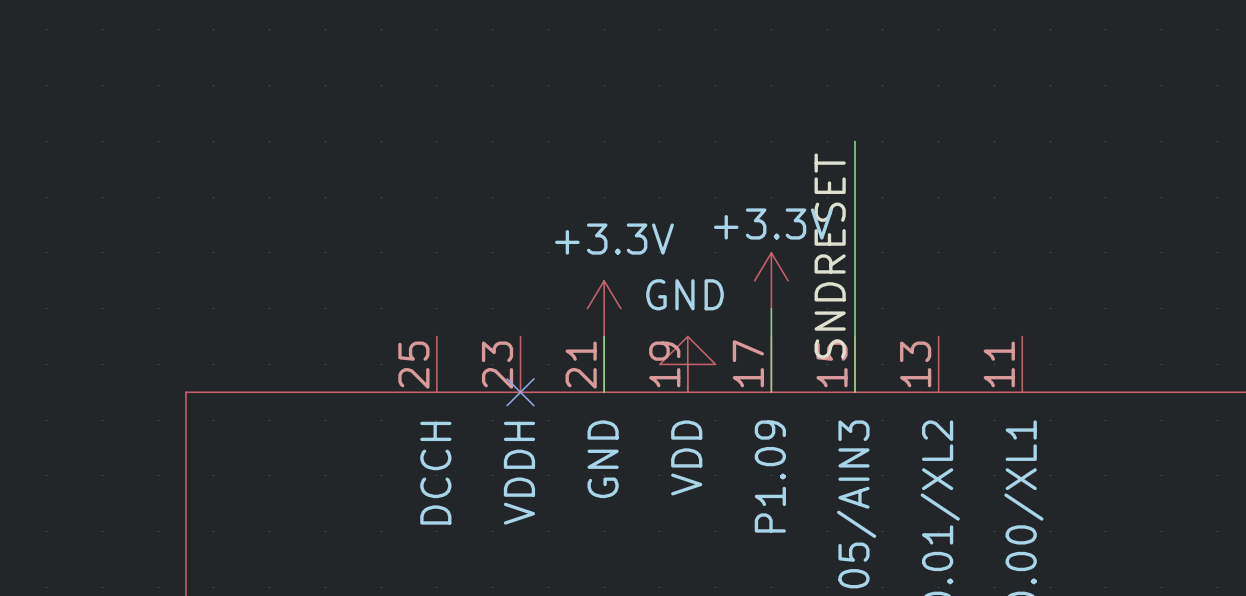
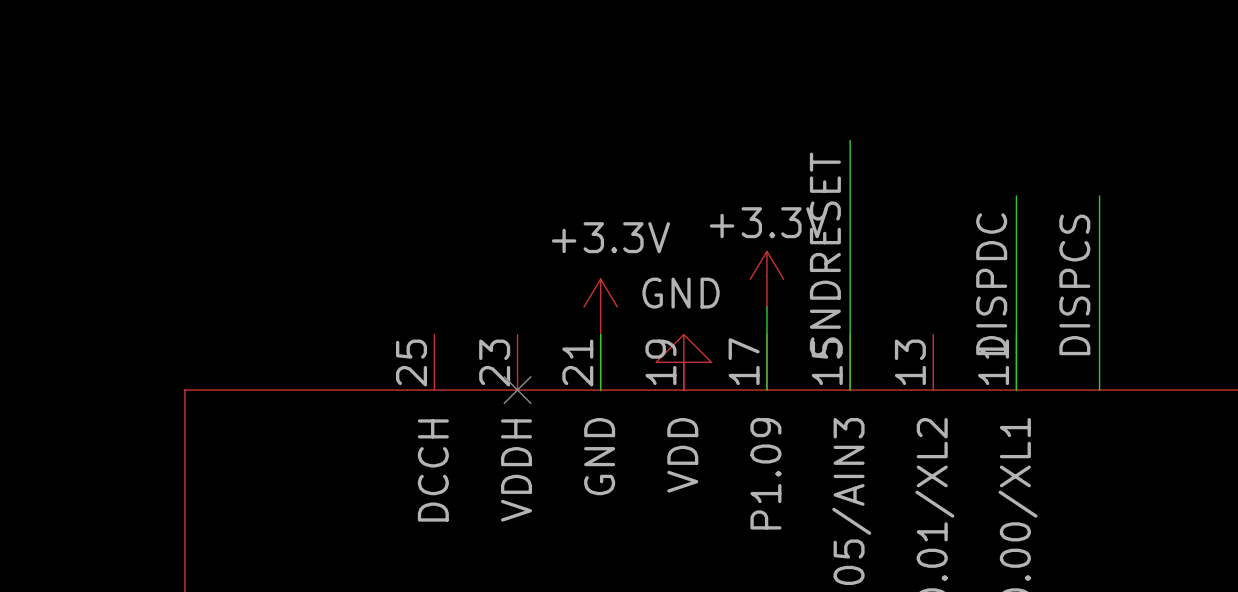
wire: none -> (1016, 196) (1016, 390)
wire: none -> (1099, 196) (1099, 390)
label: none -> DISPDC (991, 284)
label: none -> DISPCS (1074, 284)

